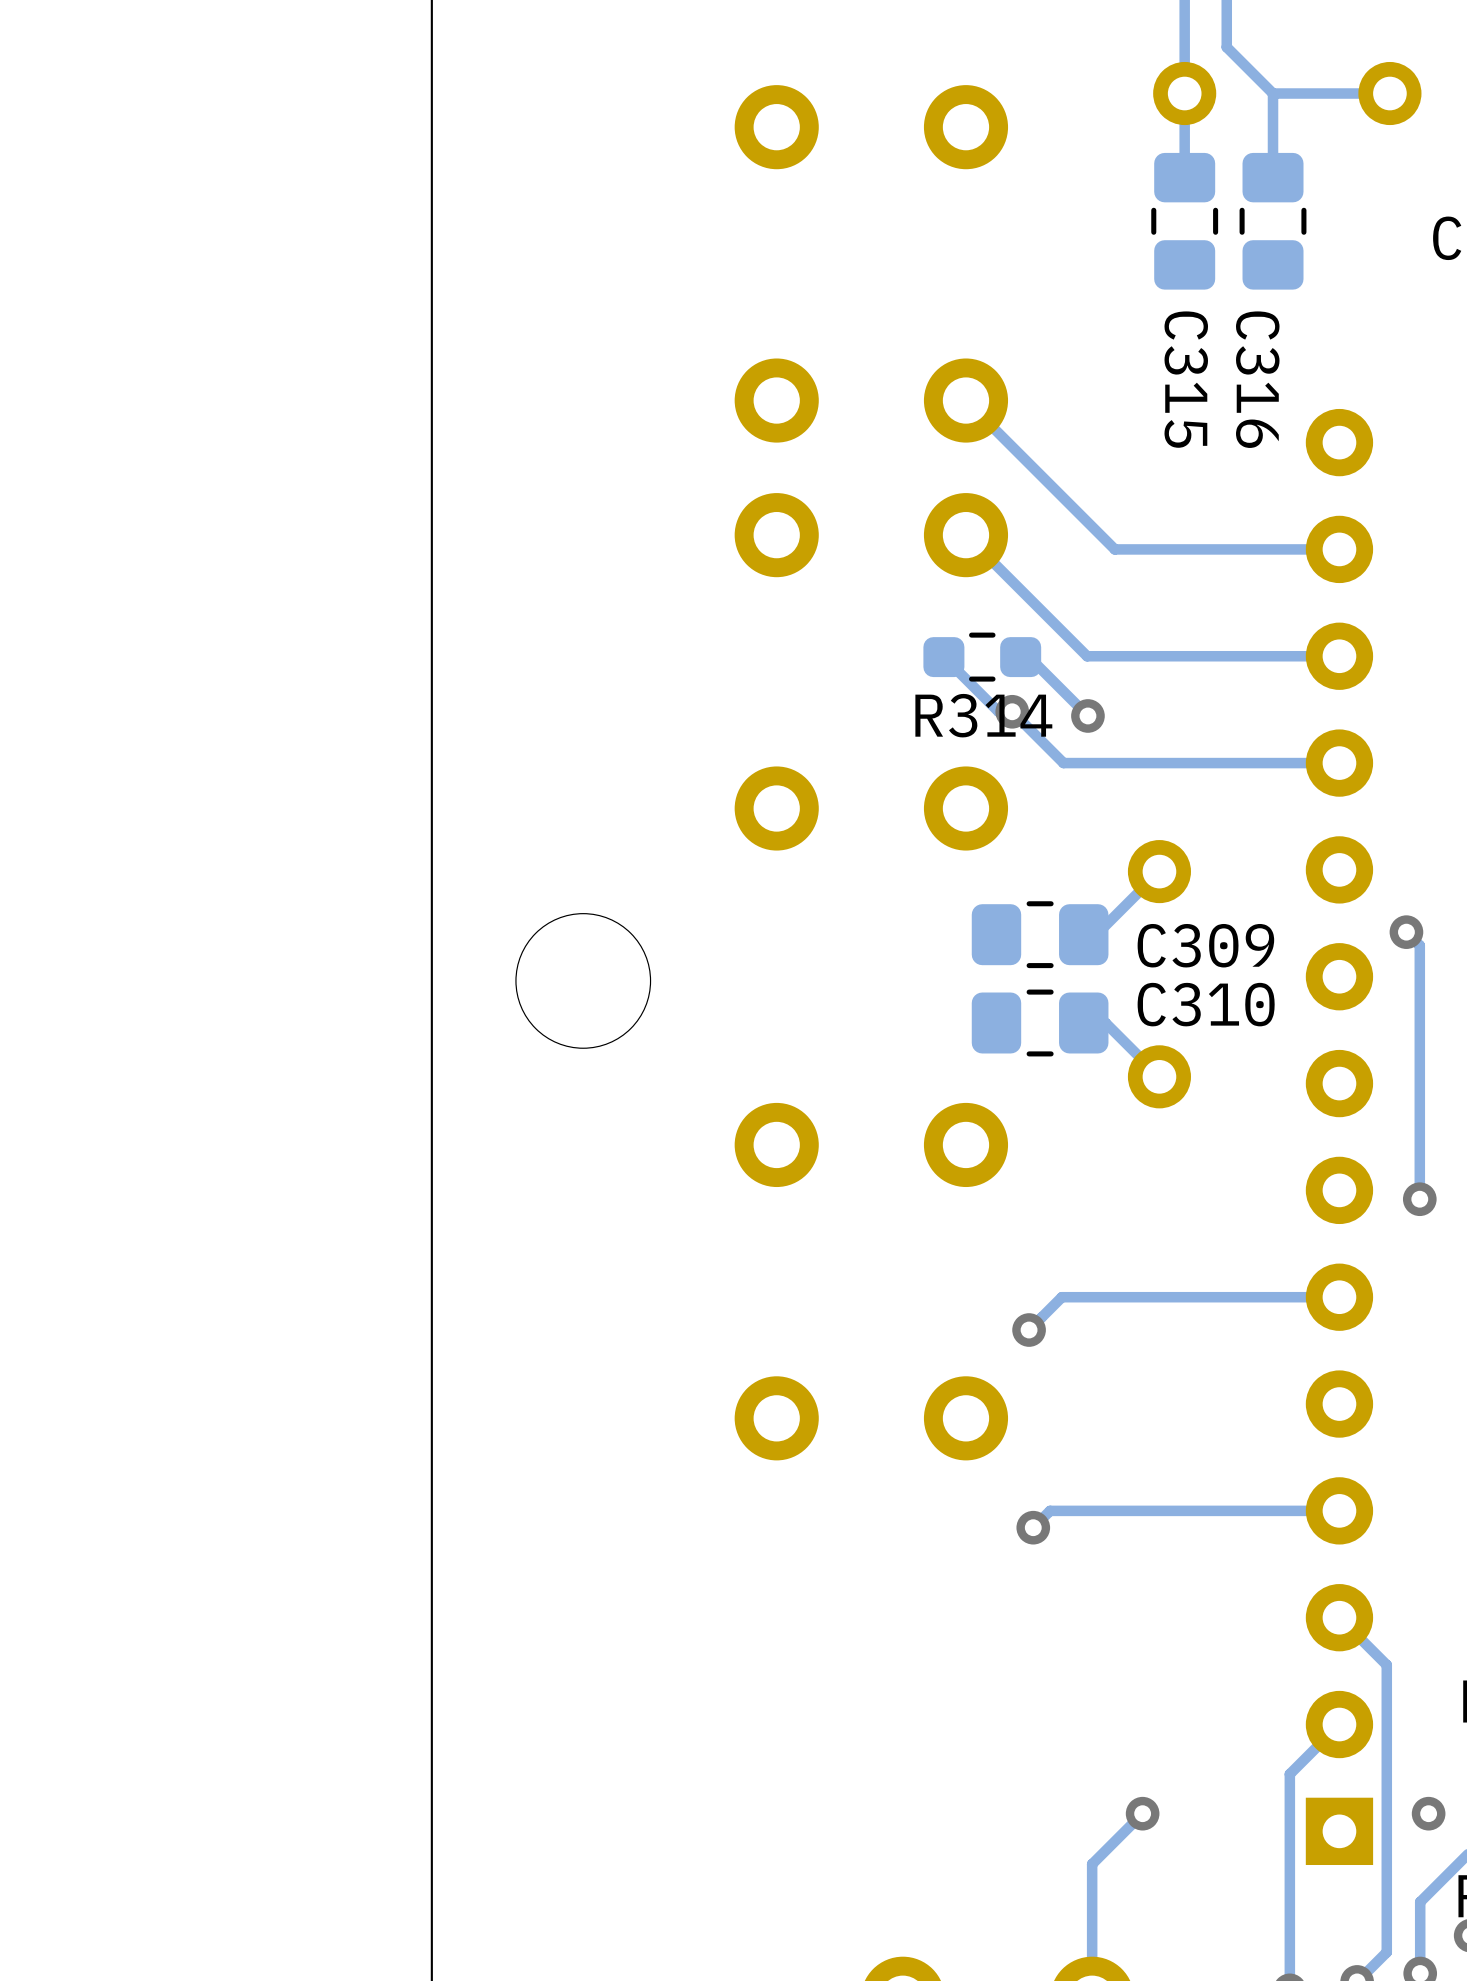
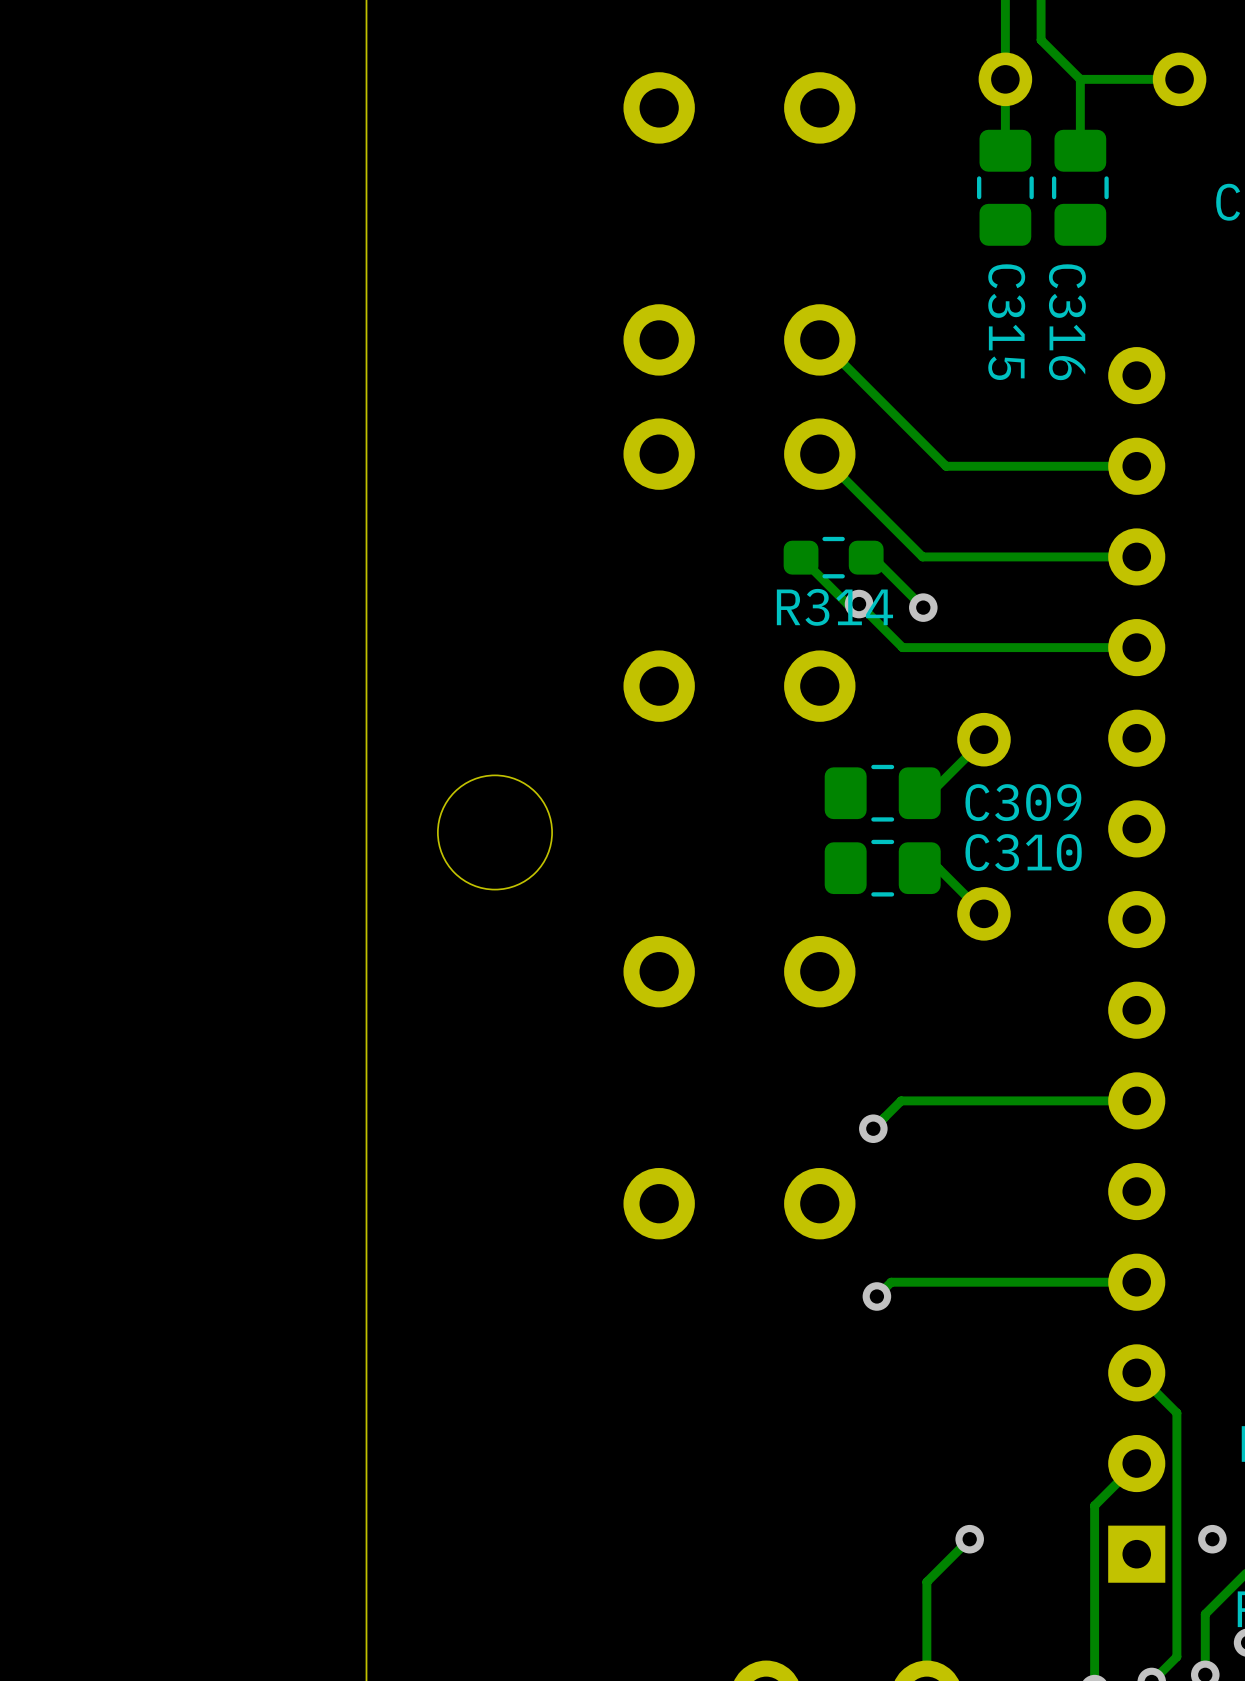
track: (1406, 932) (1419, 945) (1419, 1199) -> none
via: (1406, 932) -> none
via: (1419, 1199) -> none

